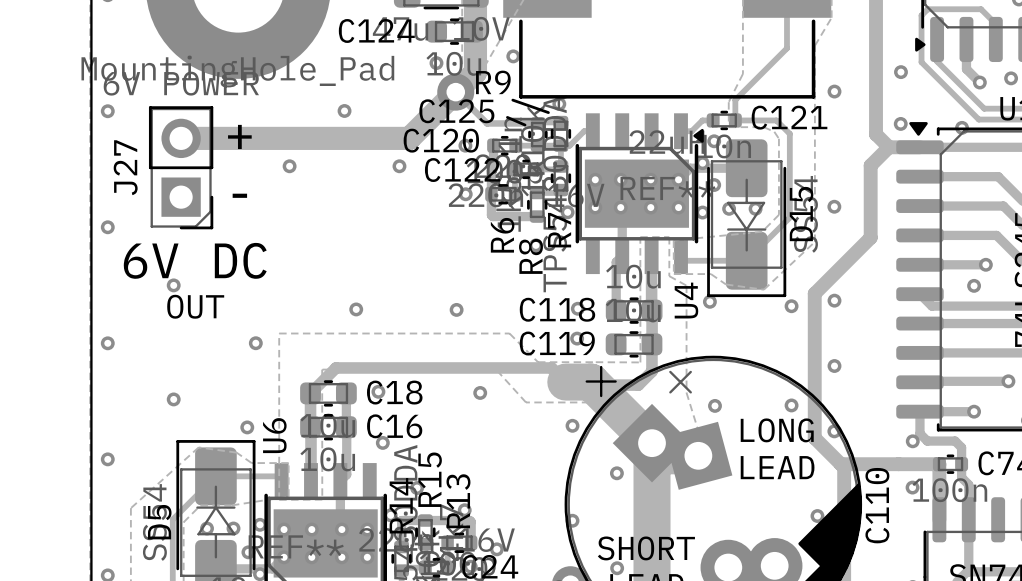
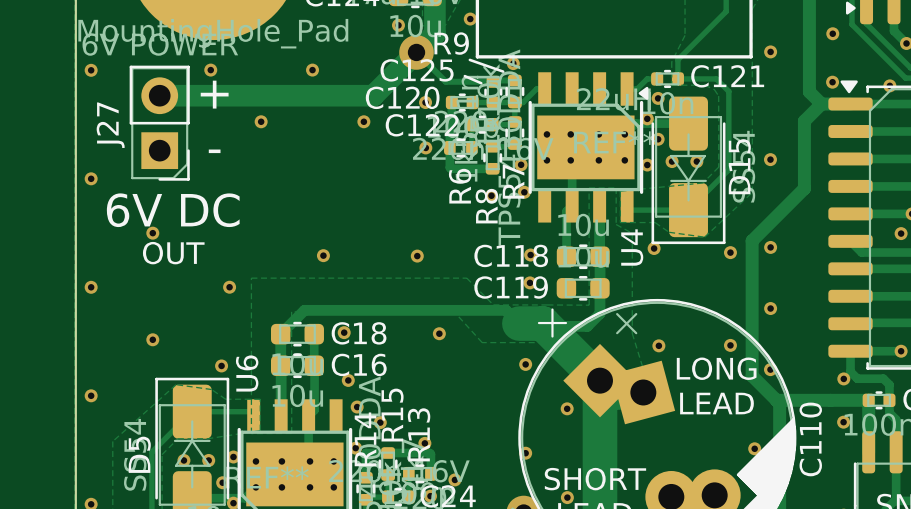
via: none -> (210, 70)
via: none -> (524, 192)
via: none -> (357, 407)

